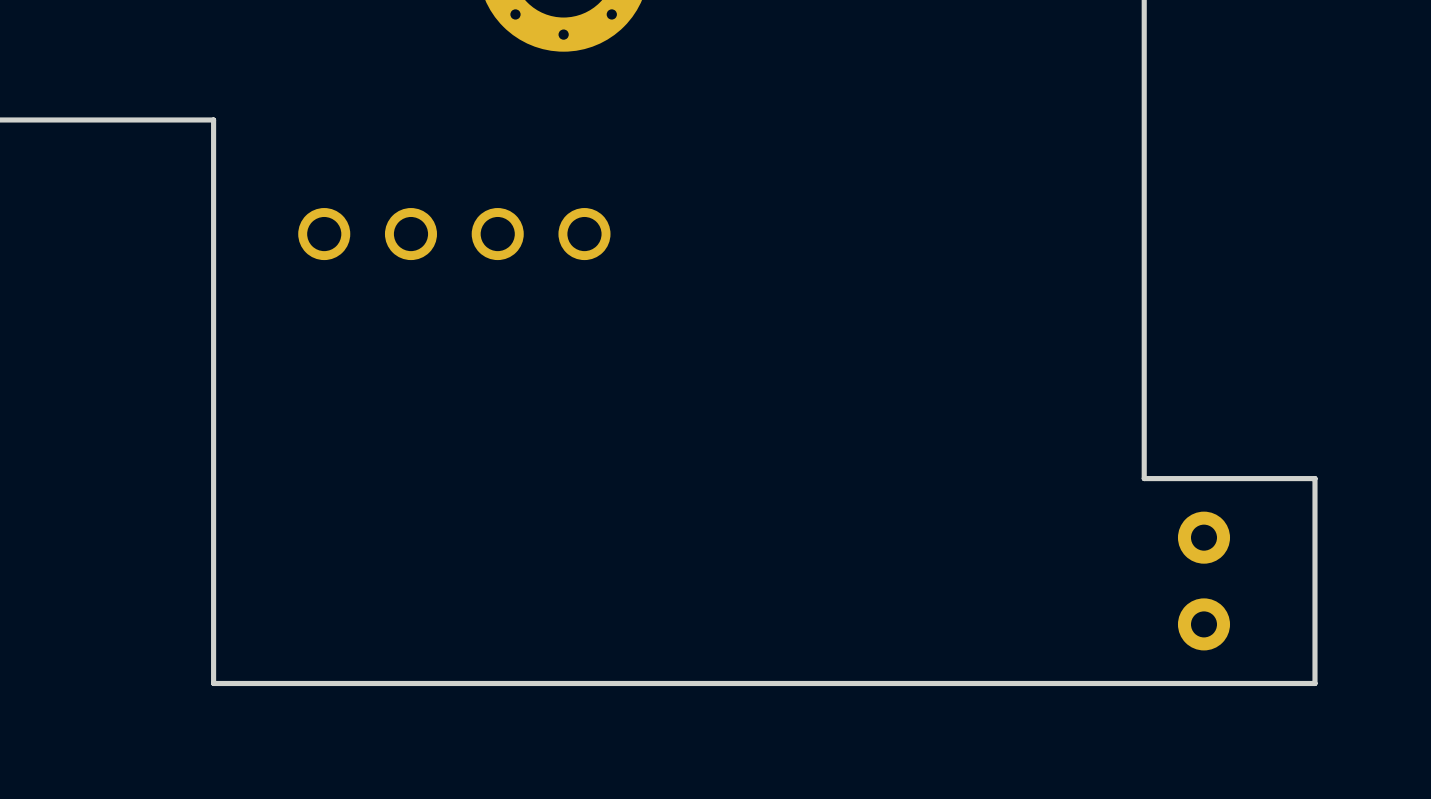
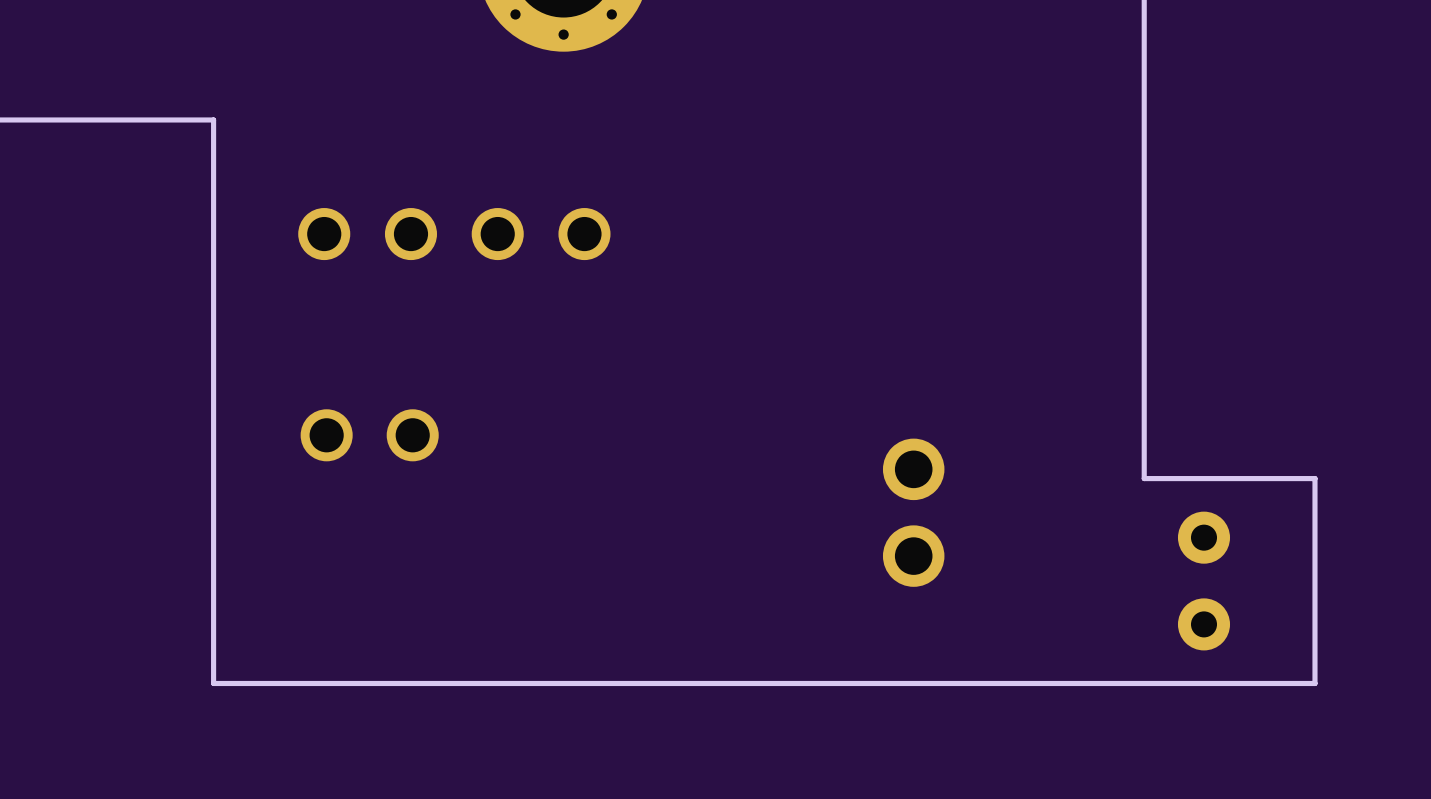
part: none -> (326, 435)
part: none -> (412, 435)
part: none -> (913, 512)

